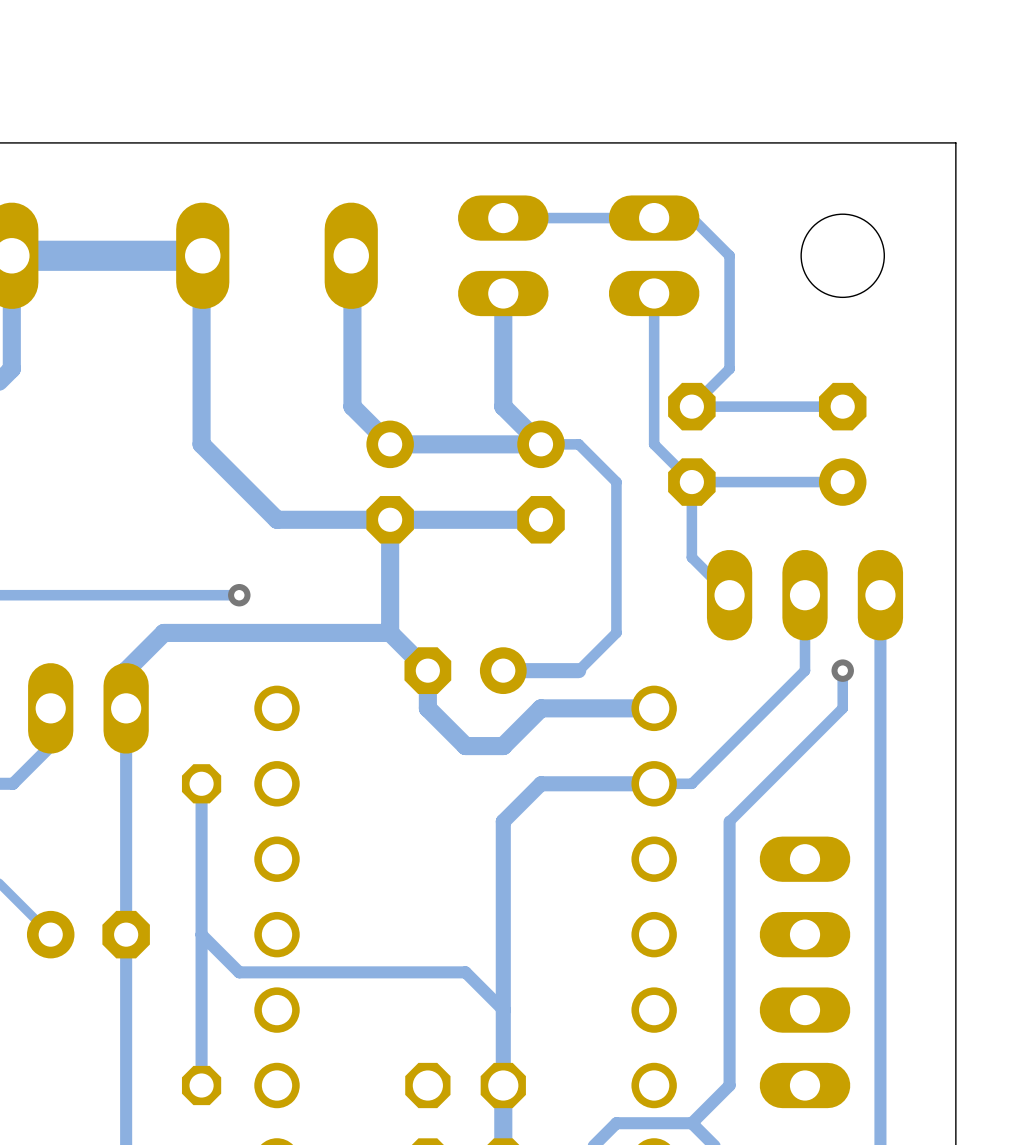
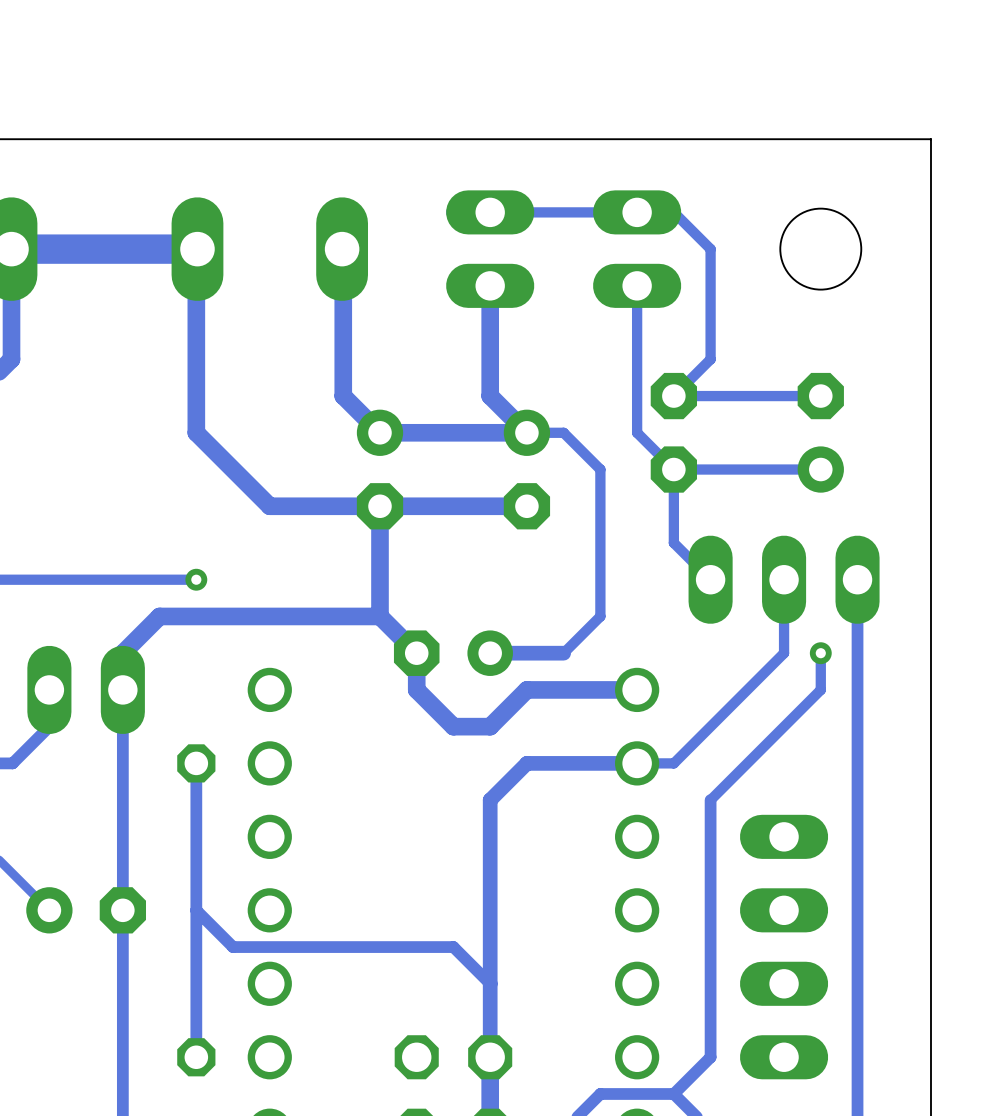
track: (239, 595) (201, 595) -> none
via position: (239, 595) -> (196, 579)

